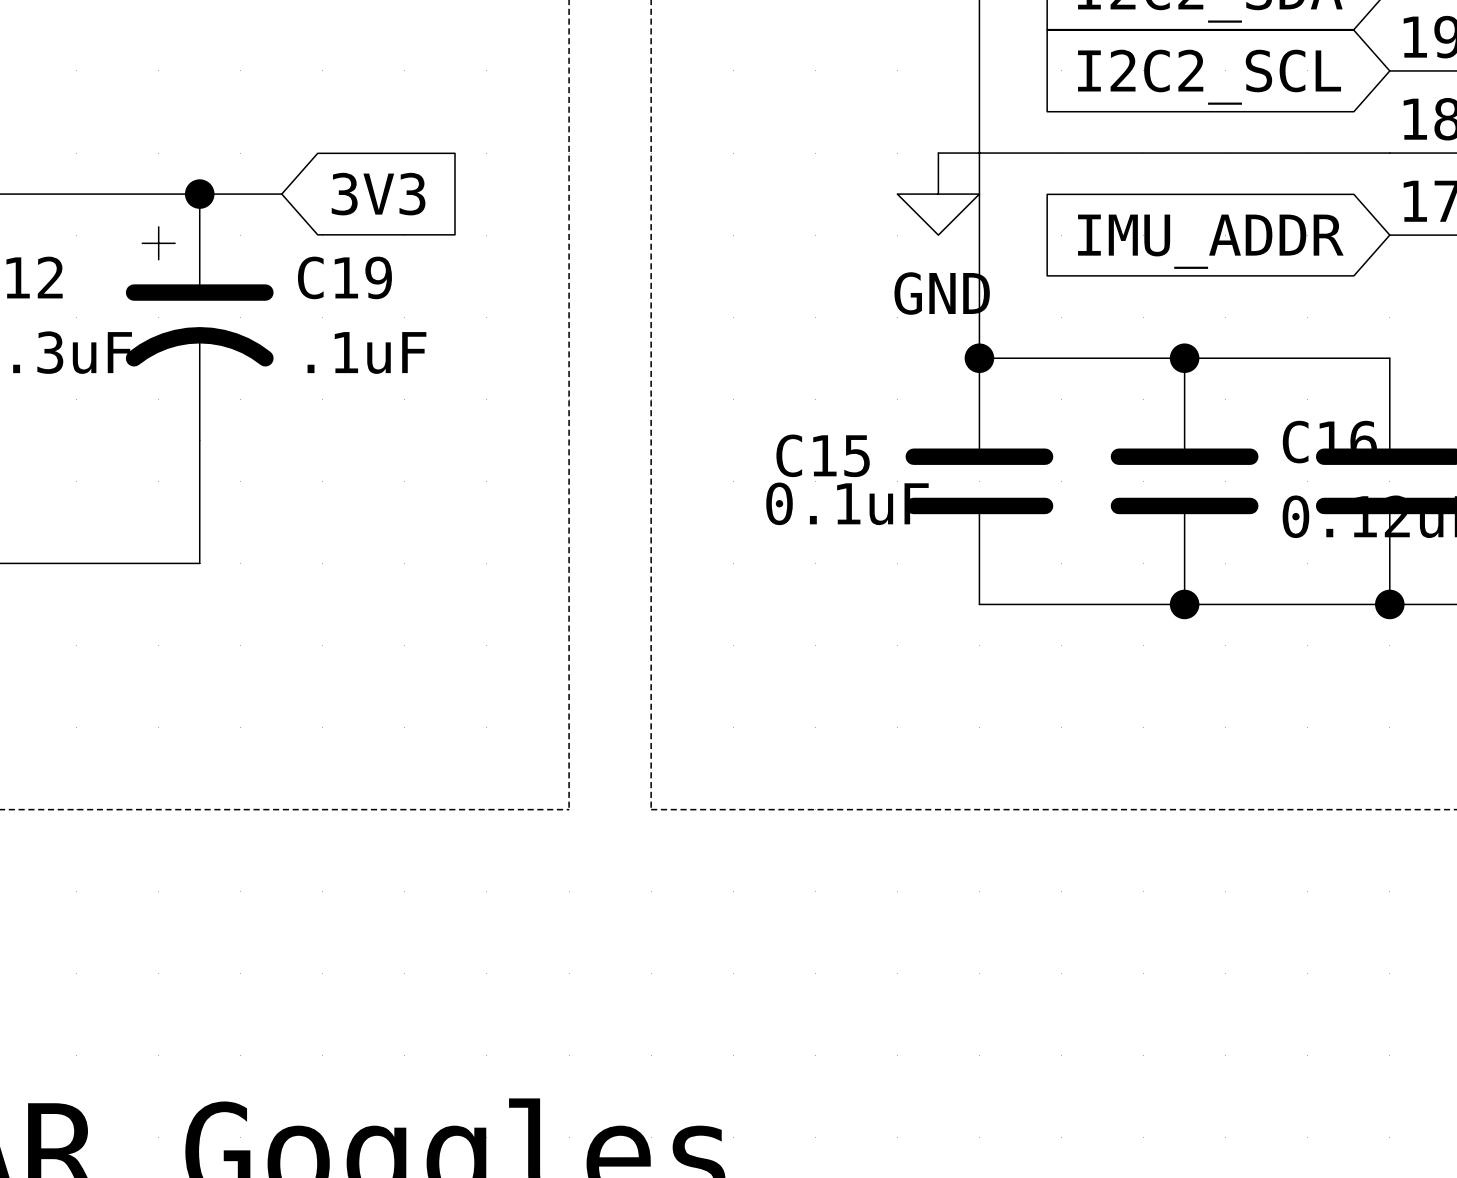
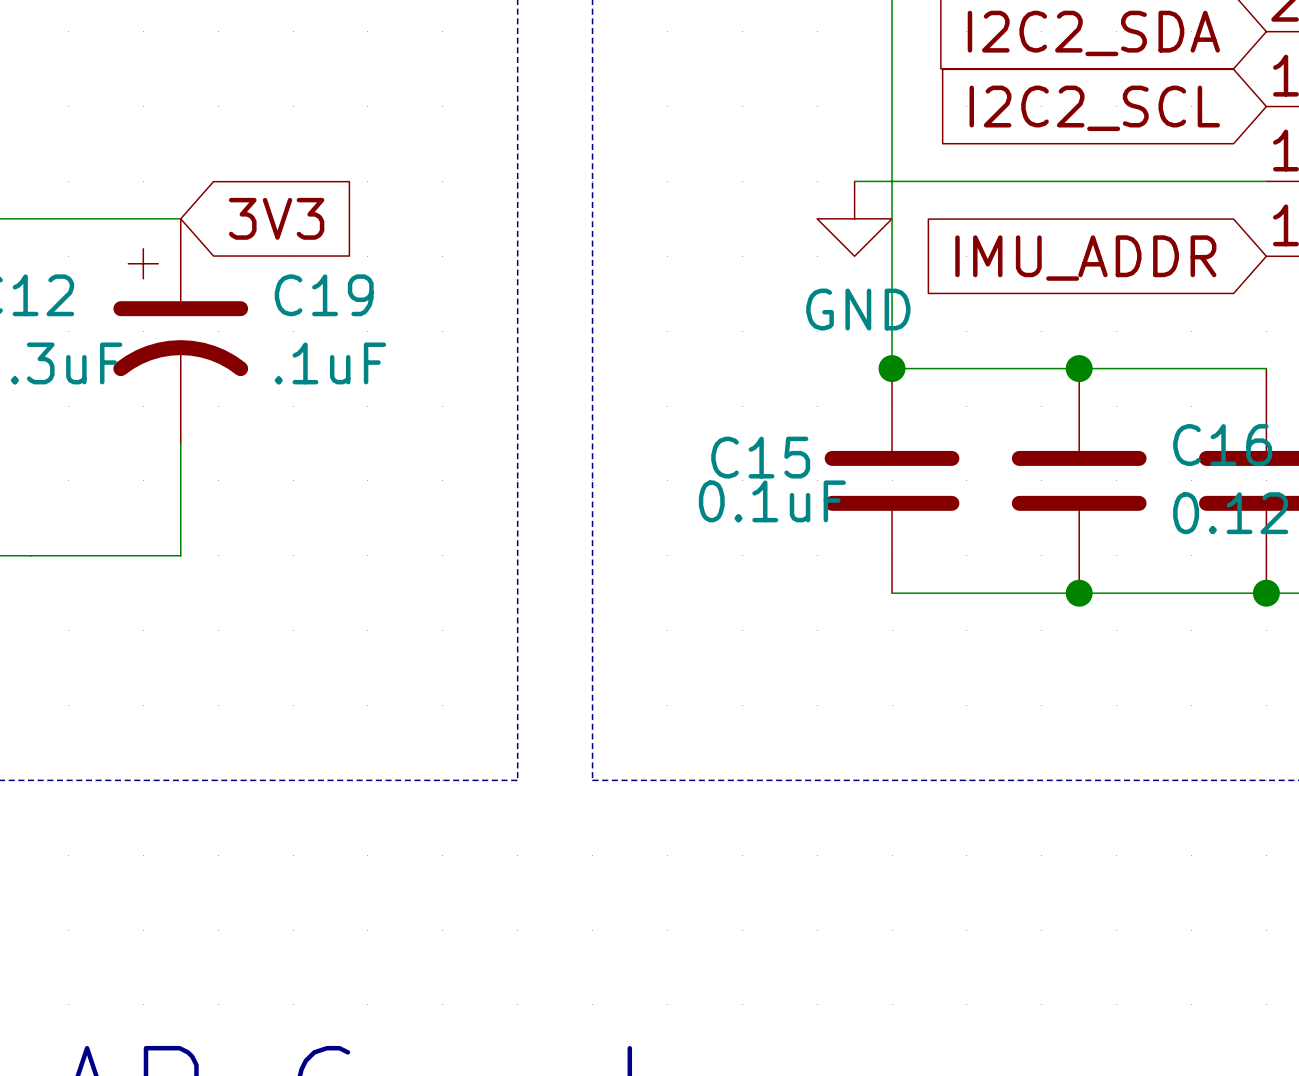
wire: (199, 194) (281, 194) -> none
junction: (199, 194) -> none
global label position: 3V3 (378, 194) -> 3V3 (276, 218)

